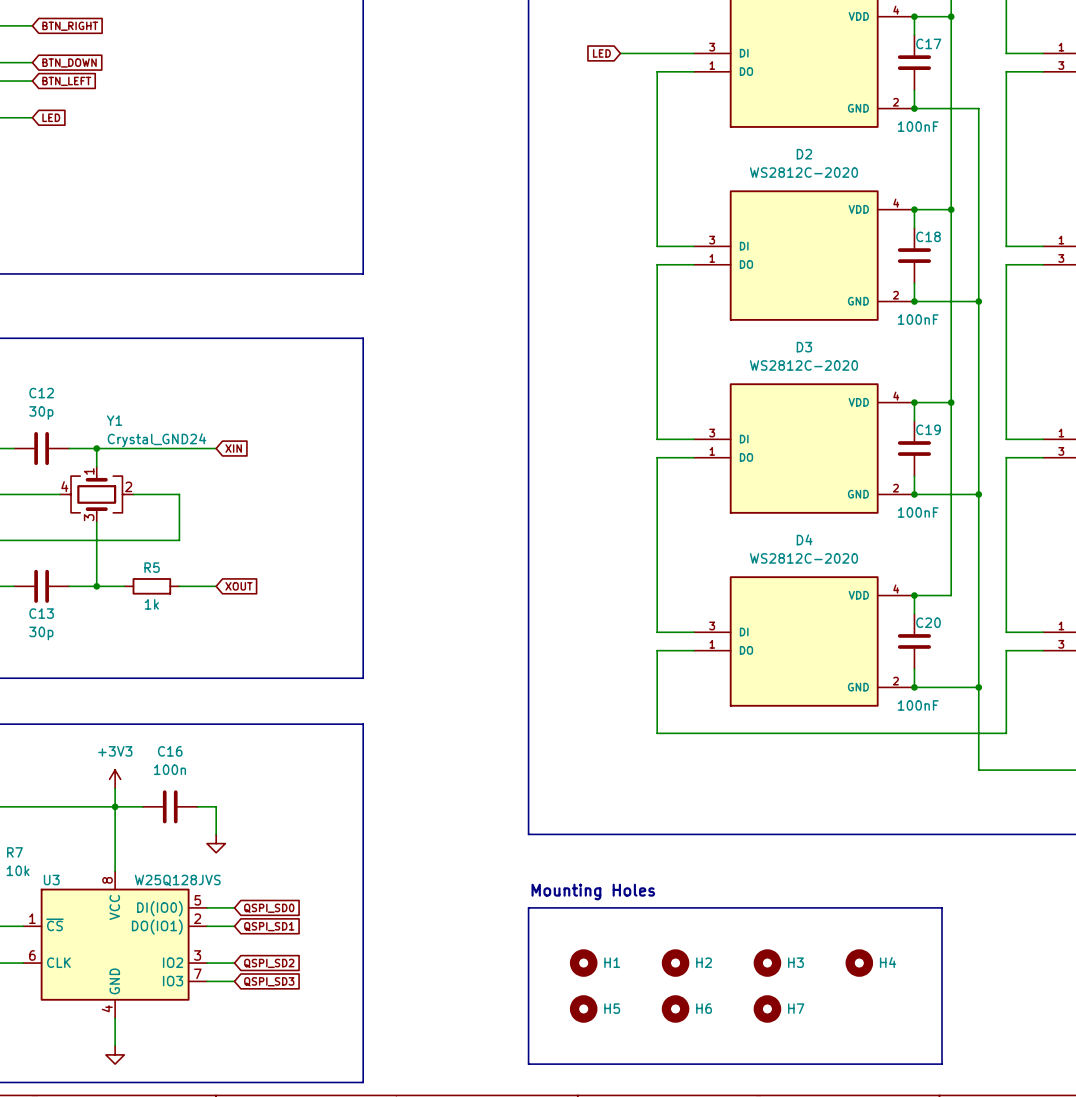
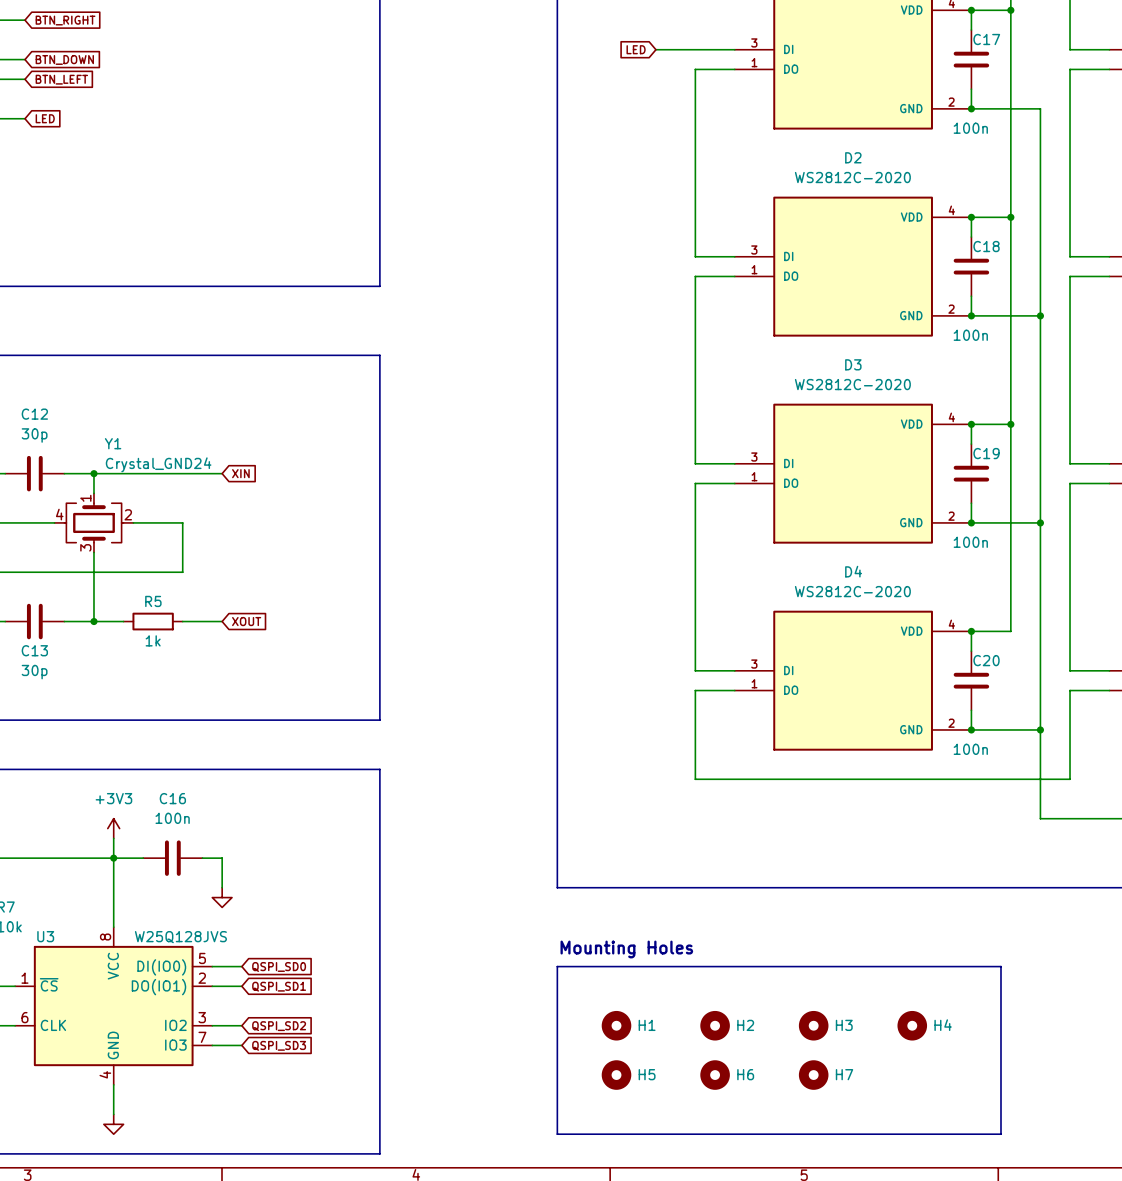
C17 value: 100nF (918, 126) -> 100n (970, 128)
C18 value: 100nF (918, 319) -> 100n (970, 335)
C19 value: 100nF (918, 512) -> 100n (970, 542)
C20 value: 100nF (918, 705) -> 100n (970, 749)

